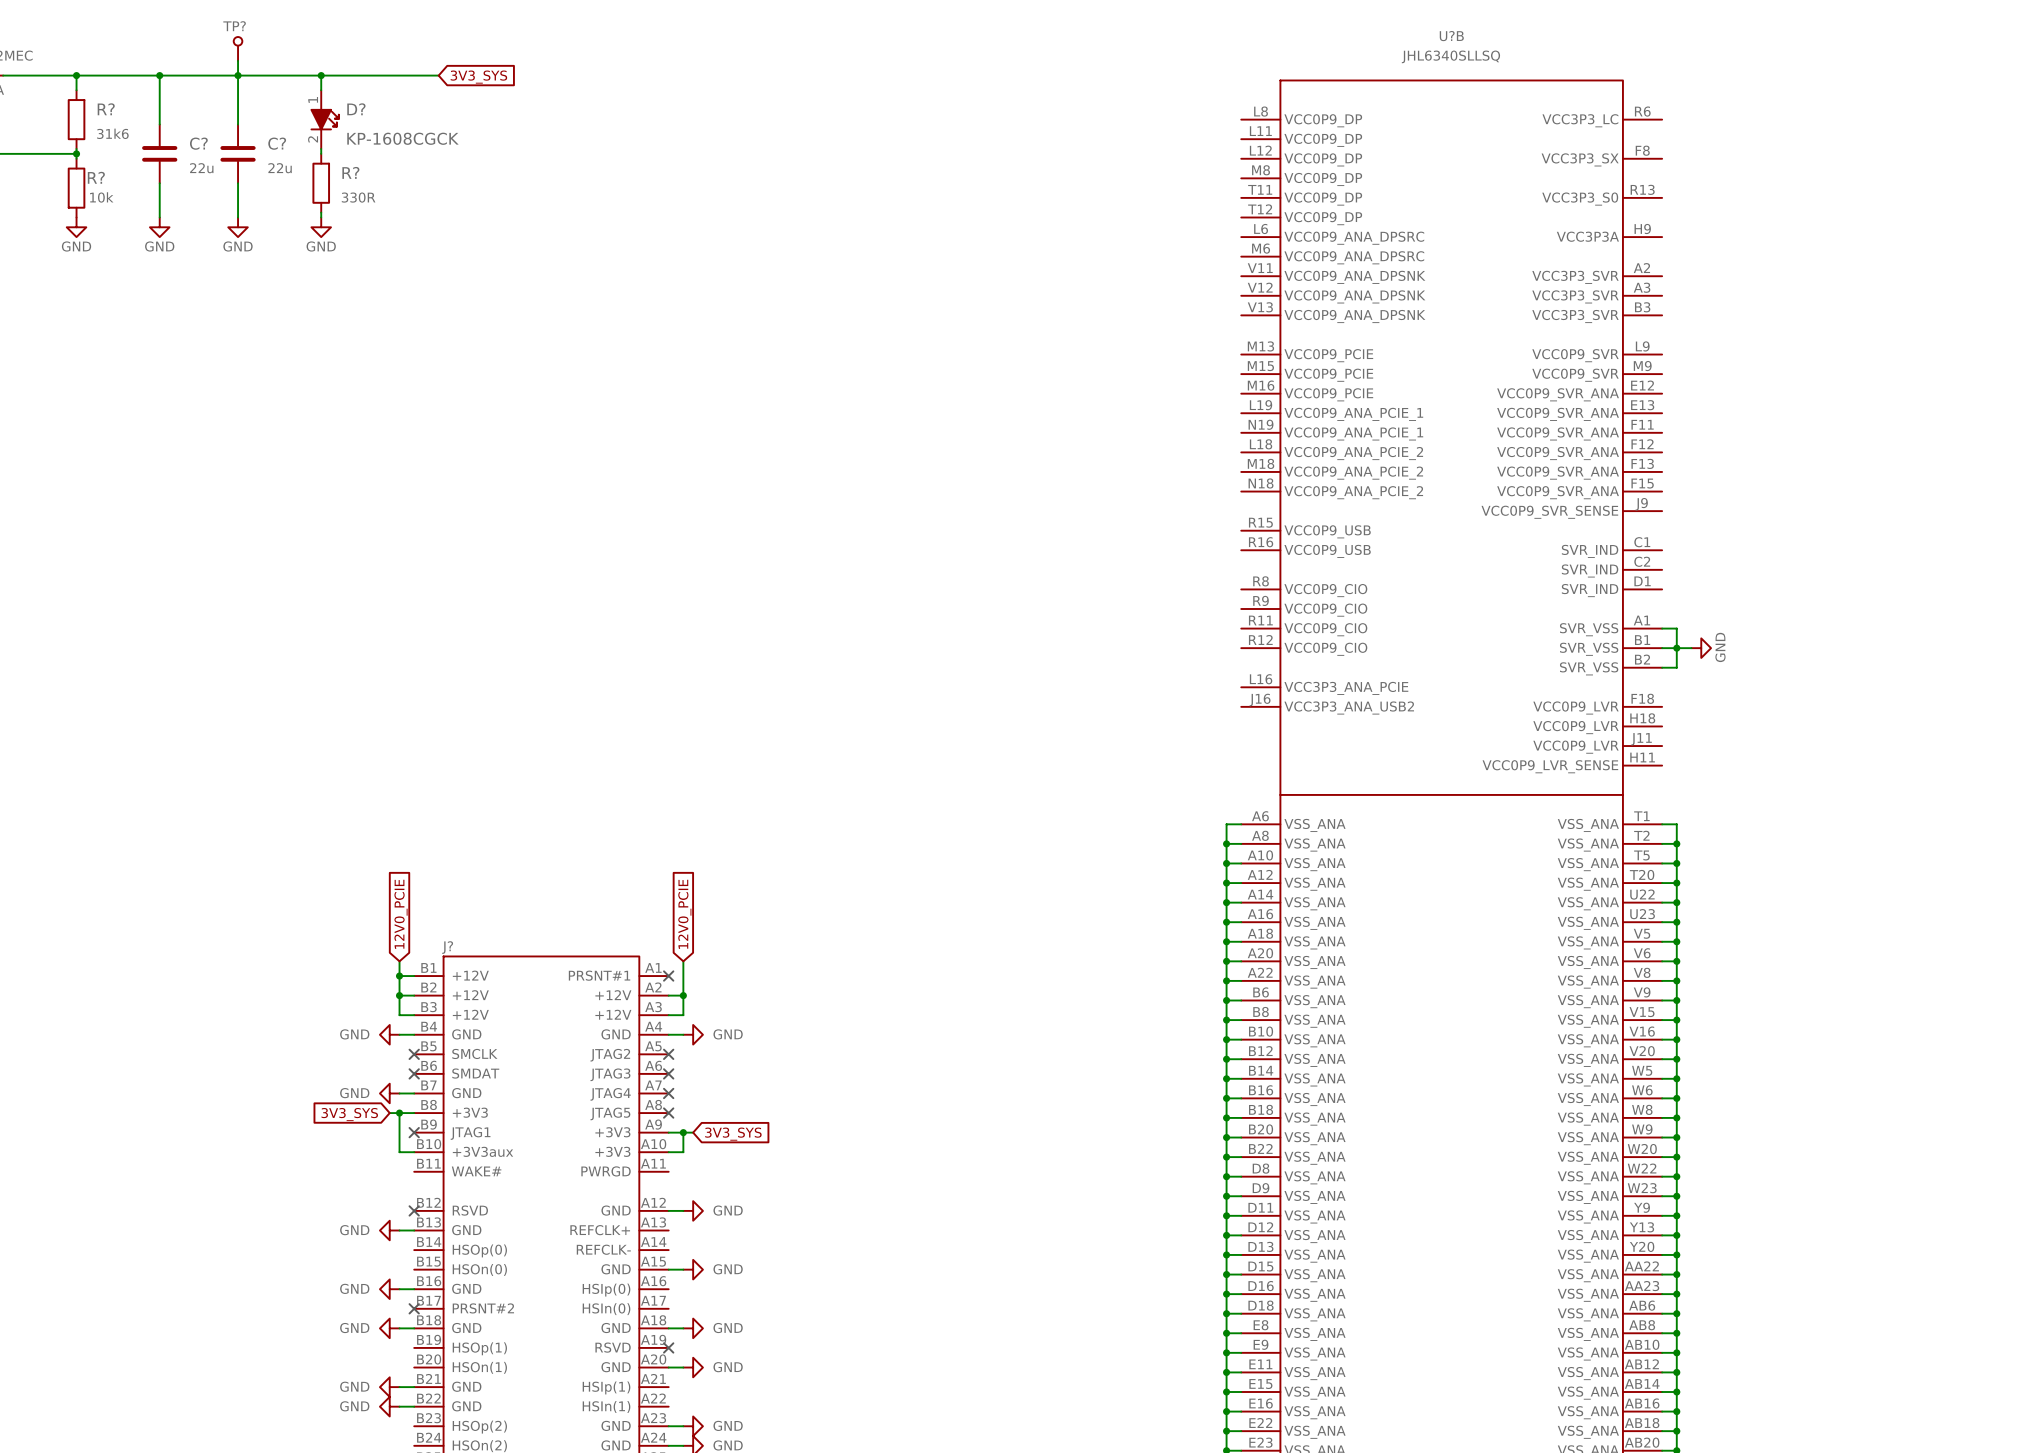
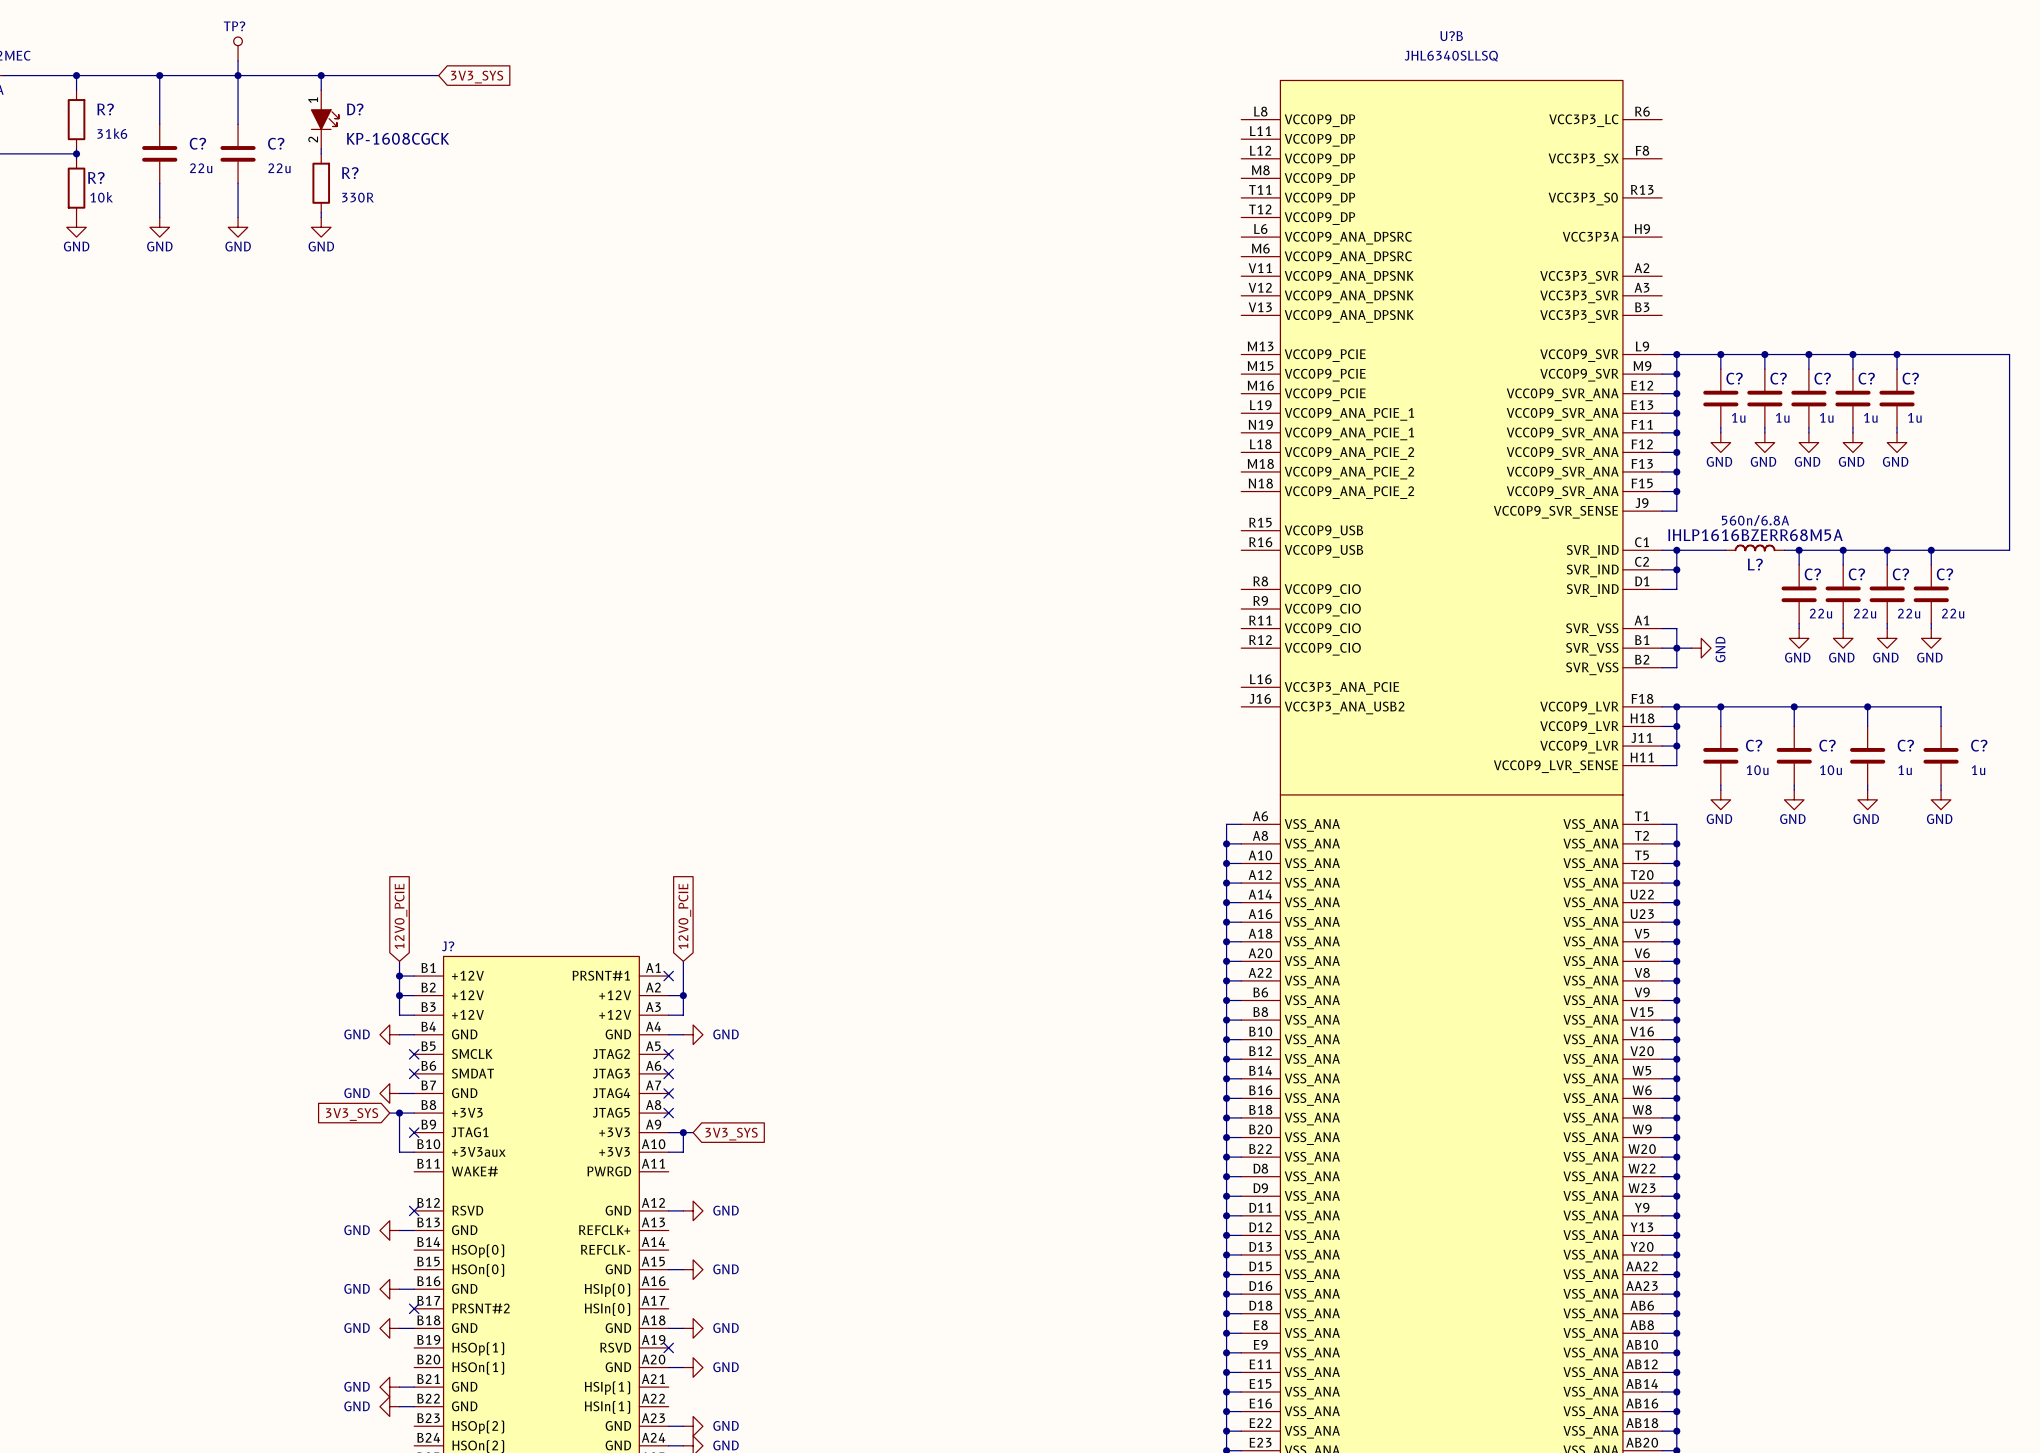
wire: none -> (1662, 354) (2009, 354) (2009, 550) (1784, 550)
wire: none -> (1676, 354) (1676, 511) (1662, 511)
junction: none -> (1676, 354)
wire: none -> (1720, 354) (1720, 369)
junction: none -> (1720, 354)
wire: none -> (1764, 354) (1764, 369)
junction: none -> (1764, 354)
wire: none -> (1808, 354) (1808, 369)
junction: none -> (1808, 354)
wire: none -> (1852, 354) (1852, 369)
junction: none -> (1852, 354)
wire: none -> (1897, 354) (1897, 369)
junction: none -> (1897, 354)
wire: none -> (1662, 374) (1676, 374)
junction: none -> (1676, 374)
wire: none -> (1662, 393) (1676, 393)
junction: none -> (1676, 393)
C?: none -> (1720, 398)
C?: none -> (1764, 398)
C?: none -> (1808, 398)
C?: none -> (1852, 398)
C?: none -> (1897, 398)
wire: none -> (1662, 413) (1676, 413)
junction: none -> (1676, 413)
wire: none -> (1720, 427) (1720, 432)
wire: none -> (1764, 427) (1764, 432)
wire: none -> (1808, 427) (1808, 432)
wire: none -> (1852, 427) (1852, 432)
wire: none -> (1897, 427) (1897, 432)
wire: none -> (1662, 432) (1676, 432)
junction: none -> (1676, 432)
power symbol: none -> GND (1720, 442)
power symbol: none -> GND (1764, 442)
power symbol: none -> GND (1808, 442)
power symbol: none -> GND (1852, 442)
power symbol: none -> GND (1897, 442)
wire: none -> (1662, 452) (1676, 452)
junction: none -> (1676, 452)
wire: none -> (1662, 471) (1676, 471)
junction: none -> (1676, 471)
wire: none -> (1662, 491) (1676, 491)
junction: none -> (1676, 491)
L?: none -> IHLP1616BZERR68M5A (1755, 548)
wire: none -> (1662, 550) (1725, 550)
wire: none -> (1676, 550) (1676, 589) (1662, 589)
junction: none -> (1676, 550)
wire: none -> (1799, 550) (1799, 564)
junction: none -> (1799, 550)
wire: none -> (1843, 550) (1843, 564)
junction: none -> (1843, 550)
wire: none -> (1887, 550) (1887, 564)
junction: none -> (1887, 550)
wire: none -> (1931, 550) (1931, 564)
junction: none -> (1931, 550)
wire: none -> (1662, 569) (1676, 569)
junction: none -> (1676, 569)
C?: none -> (1799, 594)
C?: none -> (1843, 594)
C?: none -> (1887, 594)
C?: none -> (1931, 594)
wire: none -> (1799, 623) (1799, 628)
wire: none -> (1843, 623) (1843, 628)
wire: none -> (1887, 623) (1887, 628)
wire: none -> (1931, 623) (1931, 628)
power symbol: none -> GND (1799, 638)
power symbol: none -> GND (1843, 638)
power symbol: none -> GND (1887, 638)
power symbol: none -> GND (1931, 638)
wire: none -> (1662, 706) (1941, 706) (1941, 726)
wire: none -> (1676, 706) (1676, 765) (1662, 765)
junction: none -> (1676, 706)
wire: none -> (1720, 706) (1720, 726)
junction: none -> (1720, 706)
wire: none -> (1794, 706) (1794, 726)
junction: none -> (1794, 706)
wire: none -> (1867, 706) (1867, 726)
junction: none -> (1867, 706)
wire: none -> (1662, 726) (1676, 726)
junction: none -> (1676, 726)
wire: none -> (1662, 746) (1676, 746)
junction: none -> (1676, 746)
C?: none -> (1720, 755)
C?: none -> (1794, 755)
C?: none -> (1867, 755)
C?: none -> (1941, 755)
wire: none -> (1720, 785) (1720, 790)
wire: none -> (1794, 785) (1794, 790)
wire: none -> (1867, 785) (1867, 790)
wire: none -> (1941, 785) (1941, 790)
power symbol: none -> GND (1720, 799)
power symbol: none -> GND (1794, 799)
power symbol: none -> GND (1867, 799)
power symbol: none -> GND (1941, 799)

